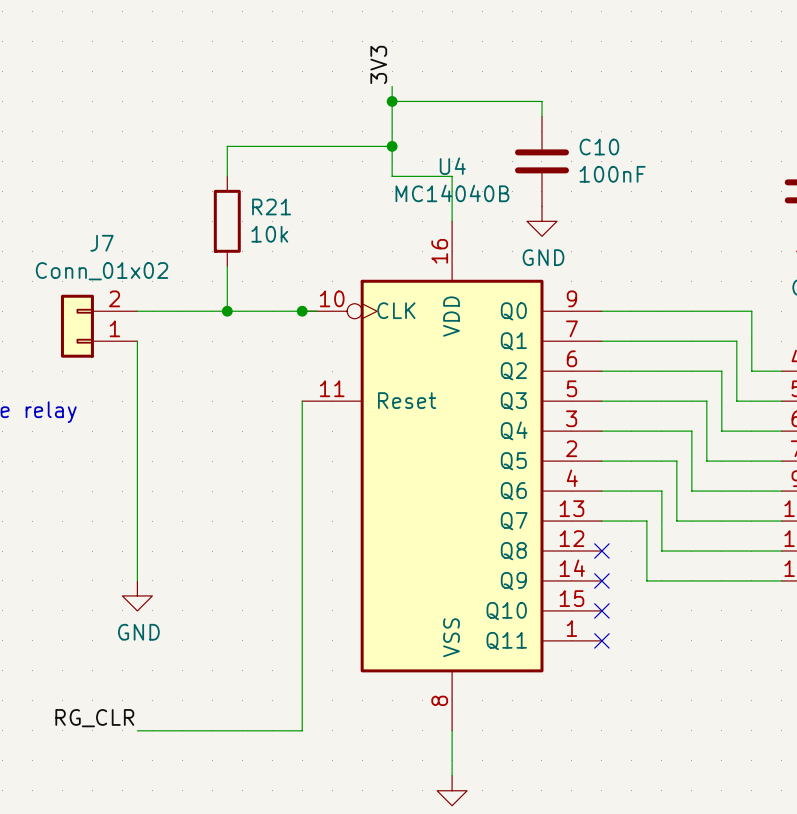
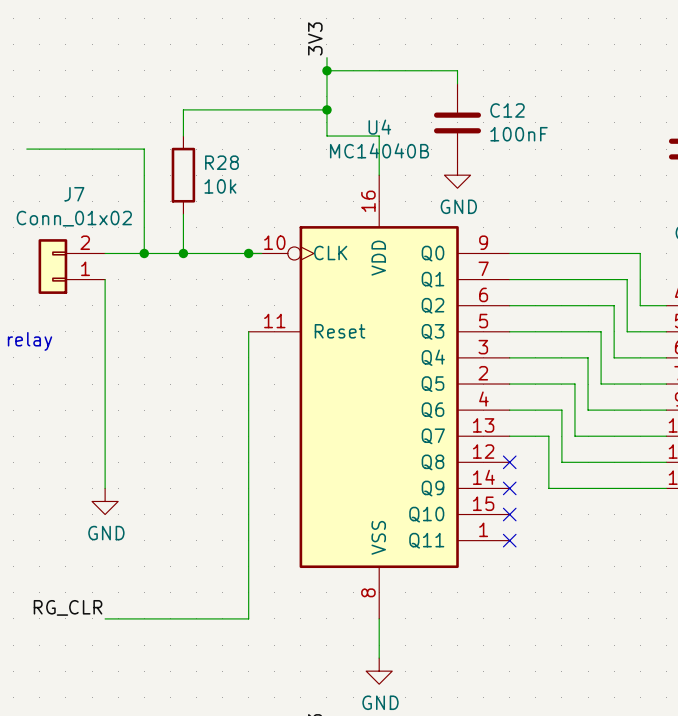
C10 name: C10 (599, 147) -> C12 (507, 110)
wire: none -> (26, 149) (144, 149) (144, 253)
R21 name: R21 (271, 206) -> R28 (221, 162)
junction: none -> (144, 253)

